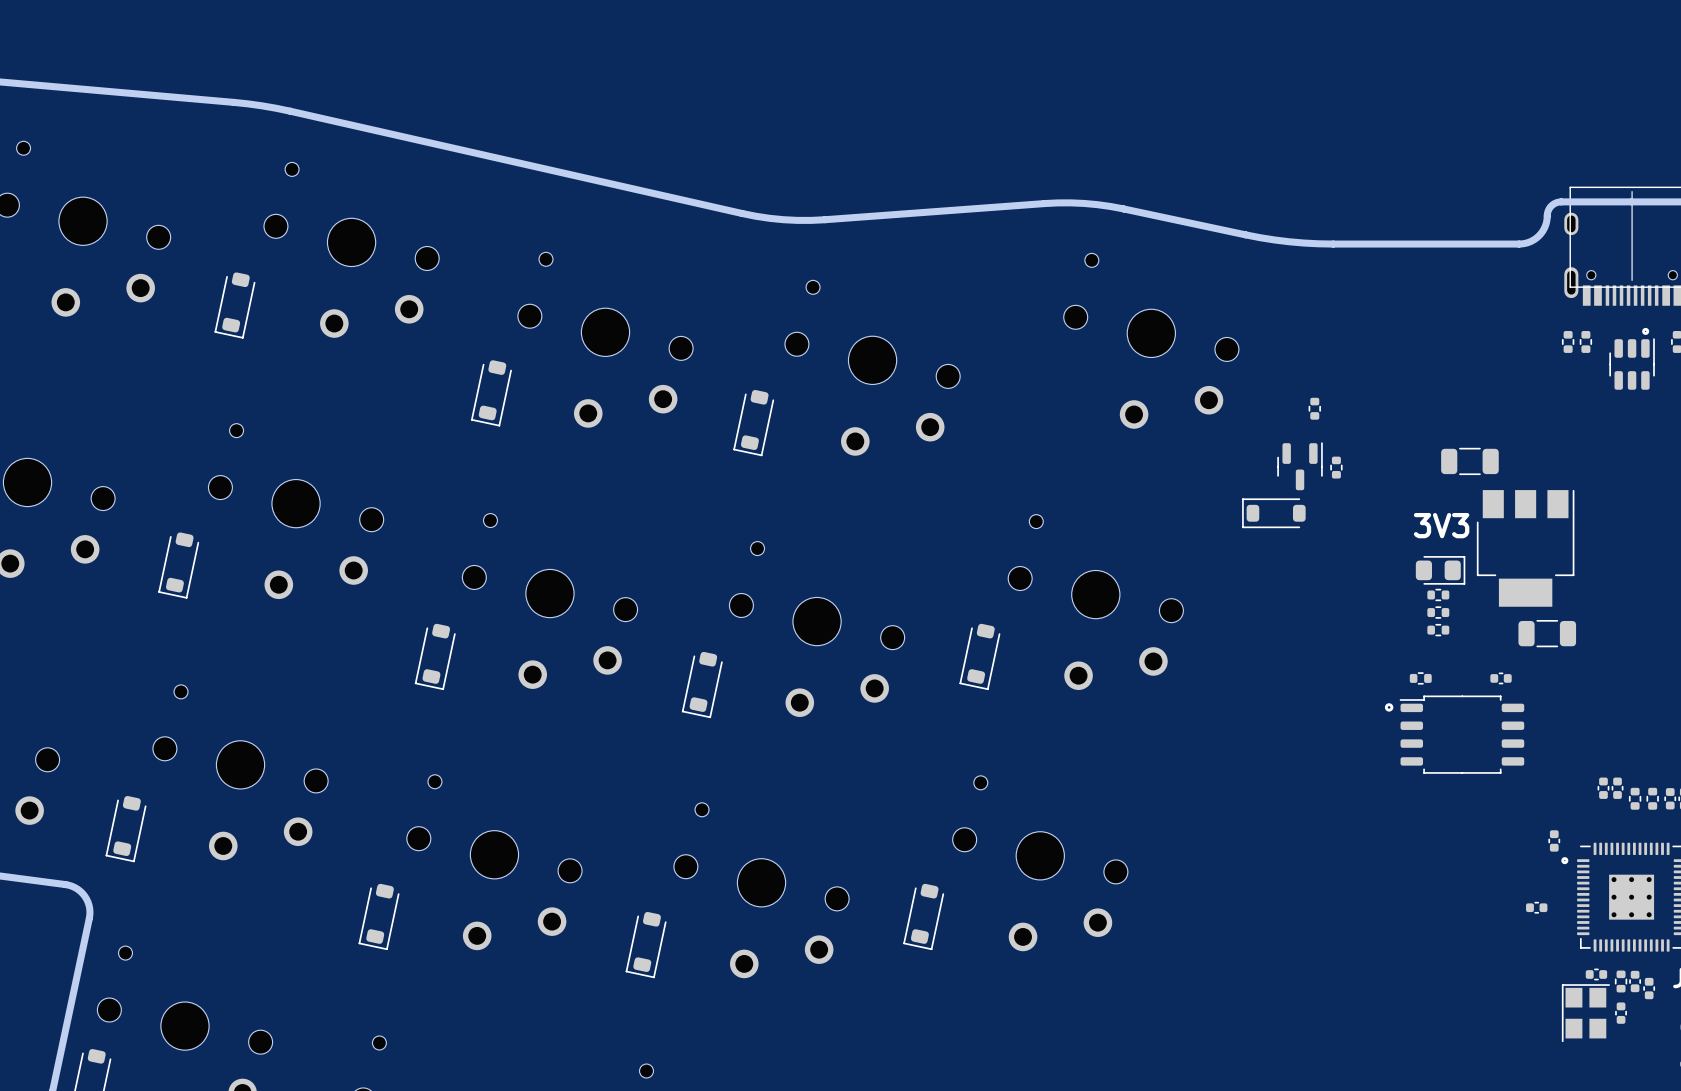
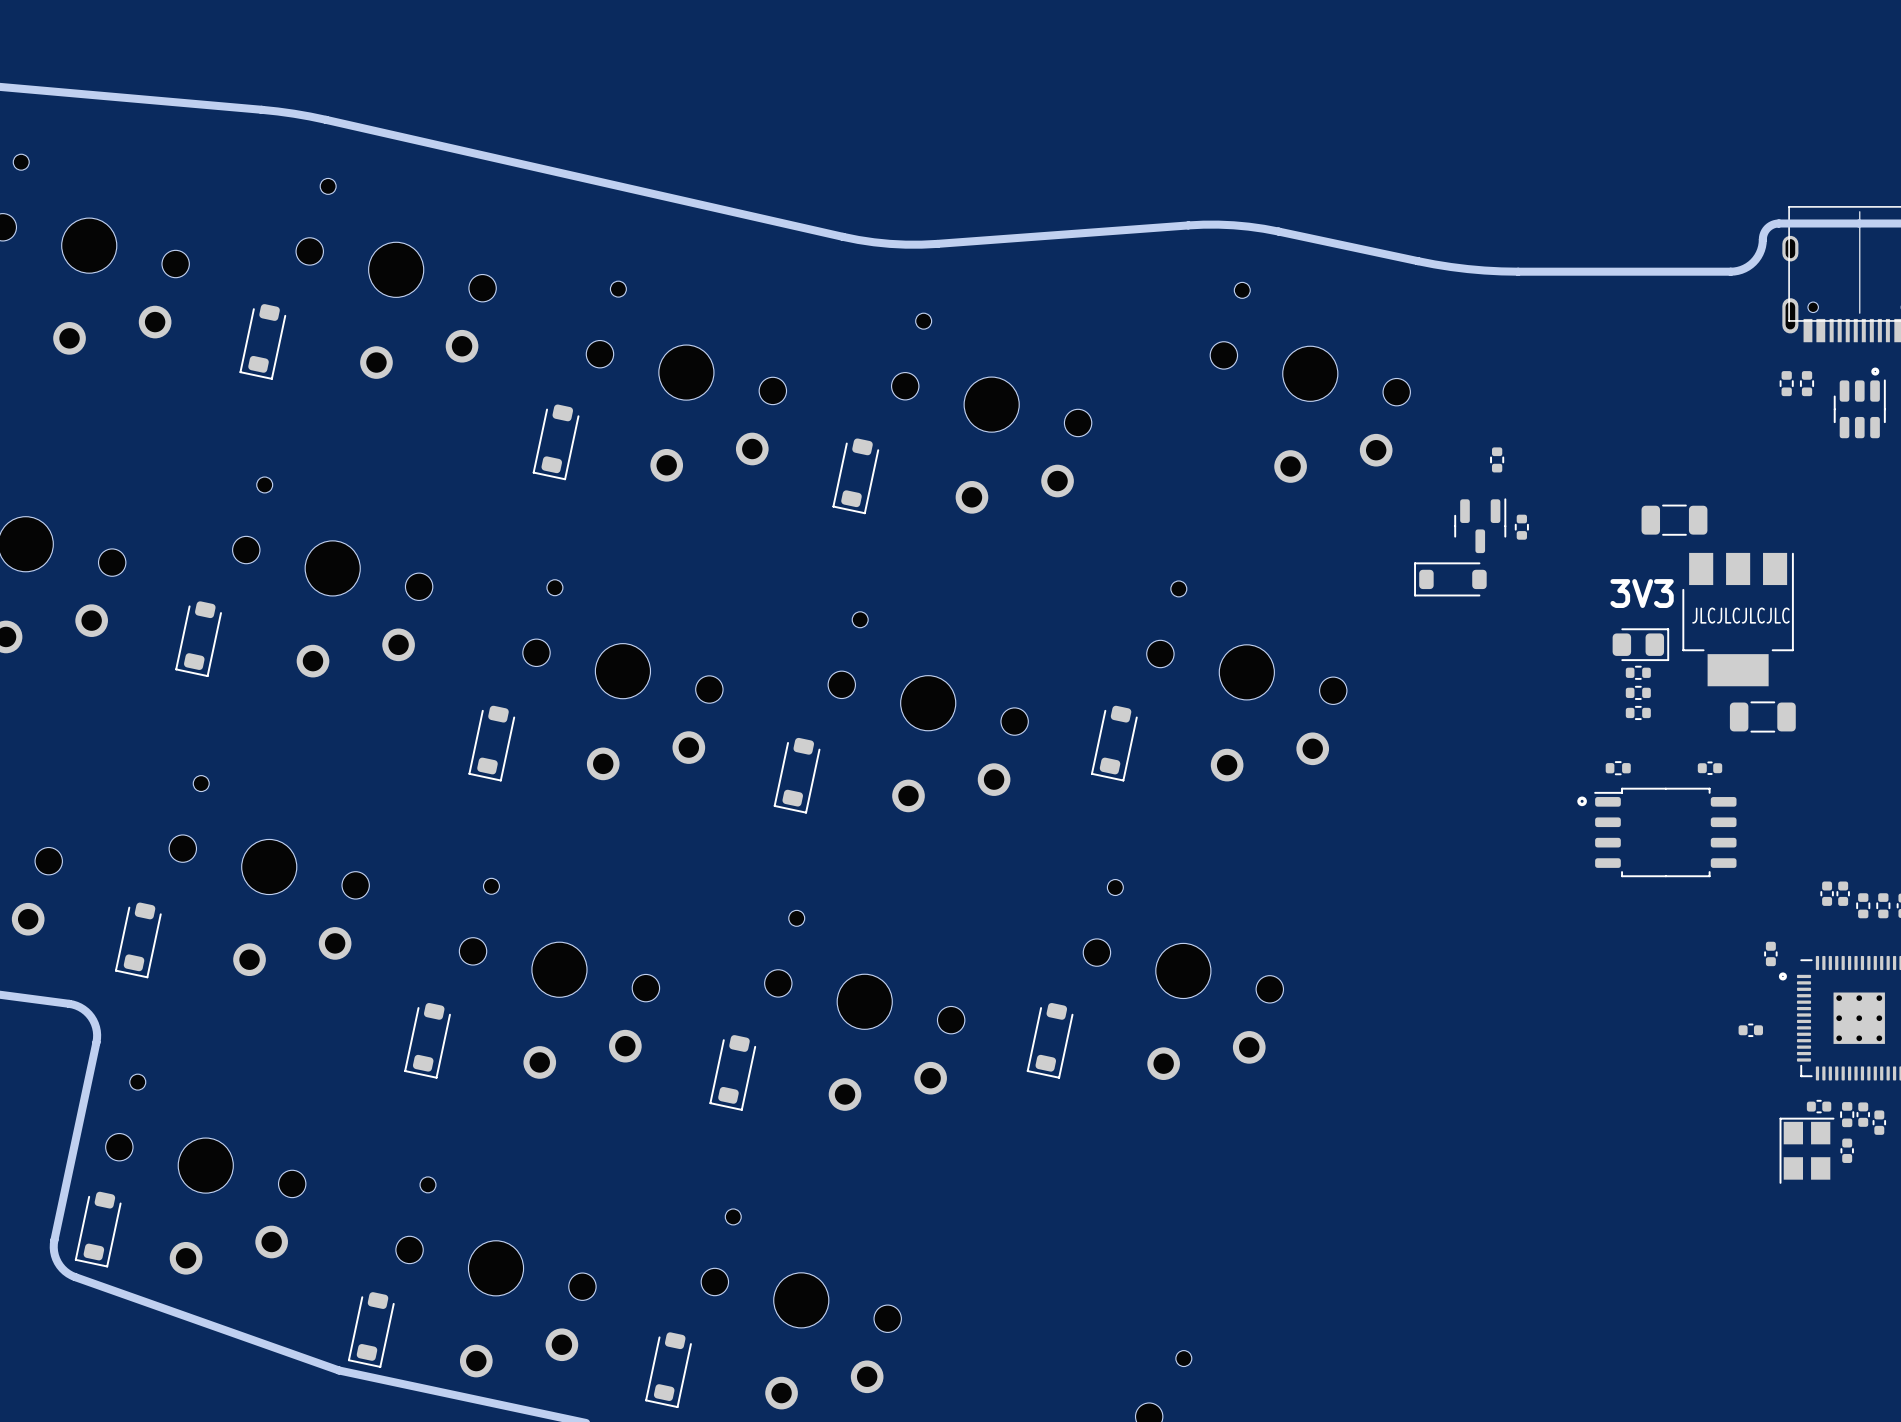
text: none -> JLCJLCJLCJLC (1740, 615)

